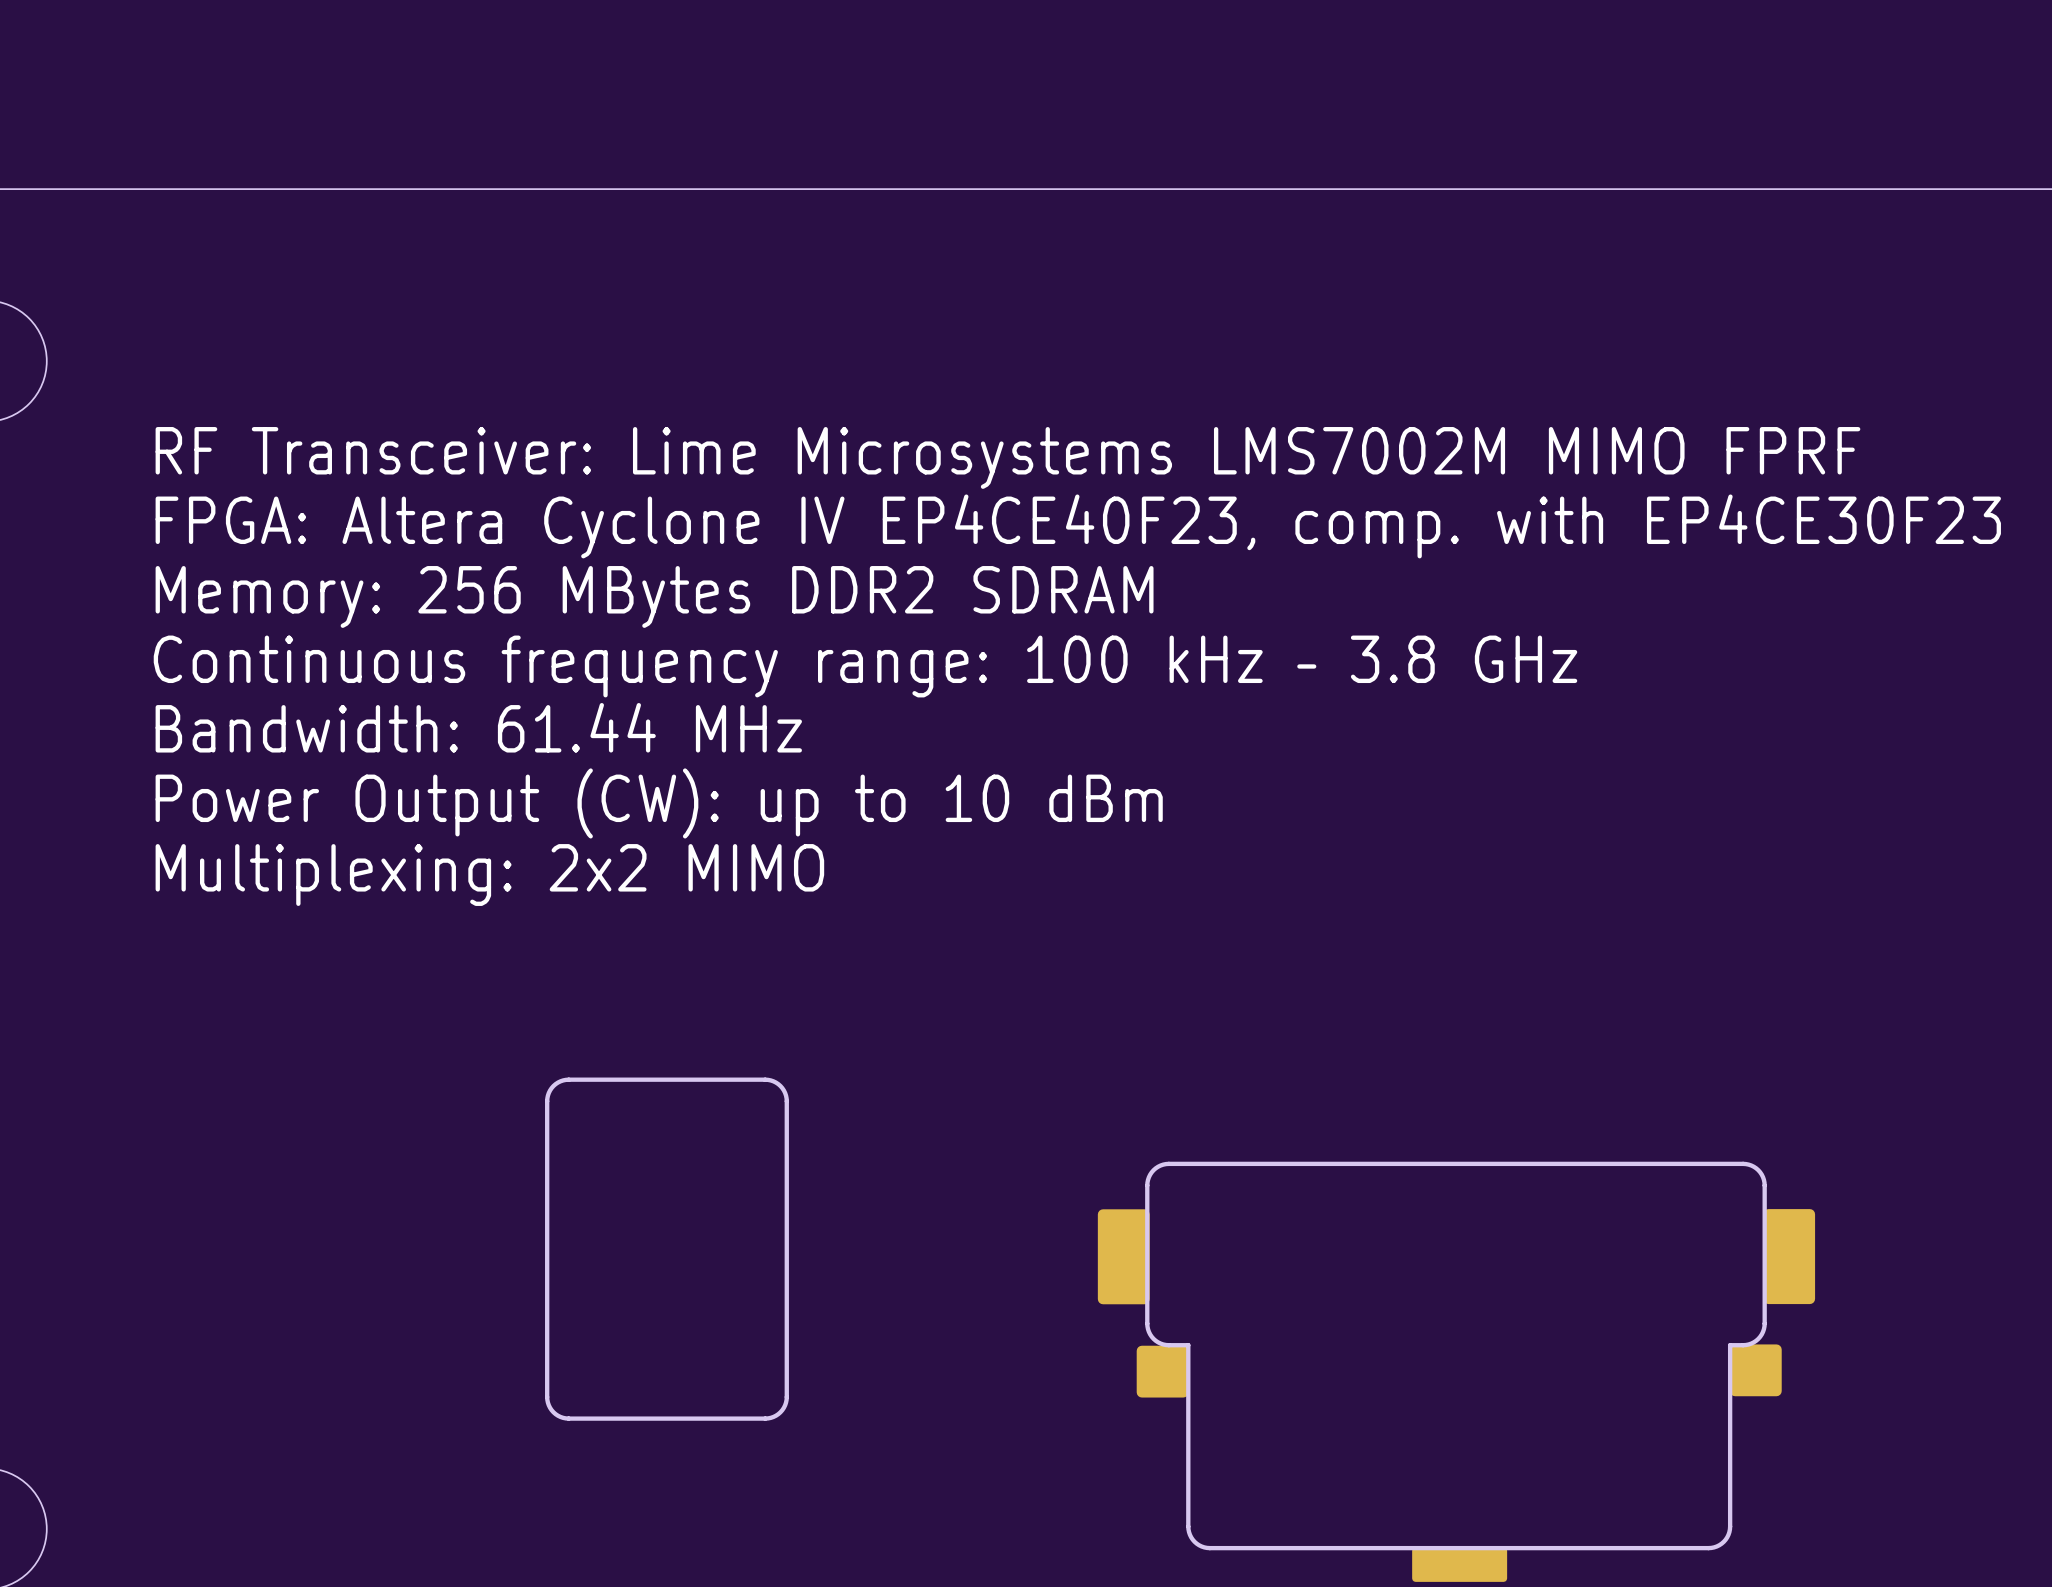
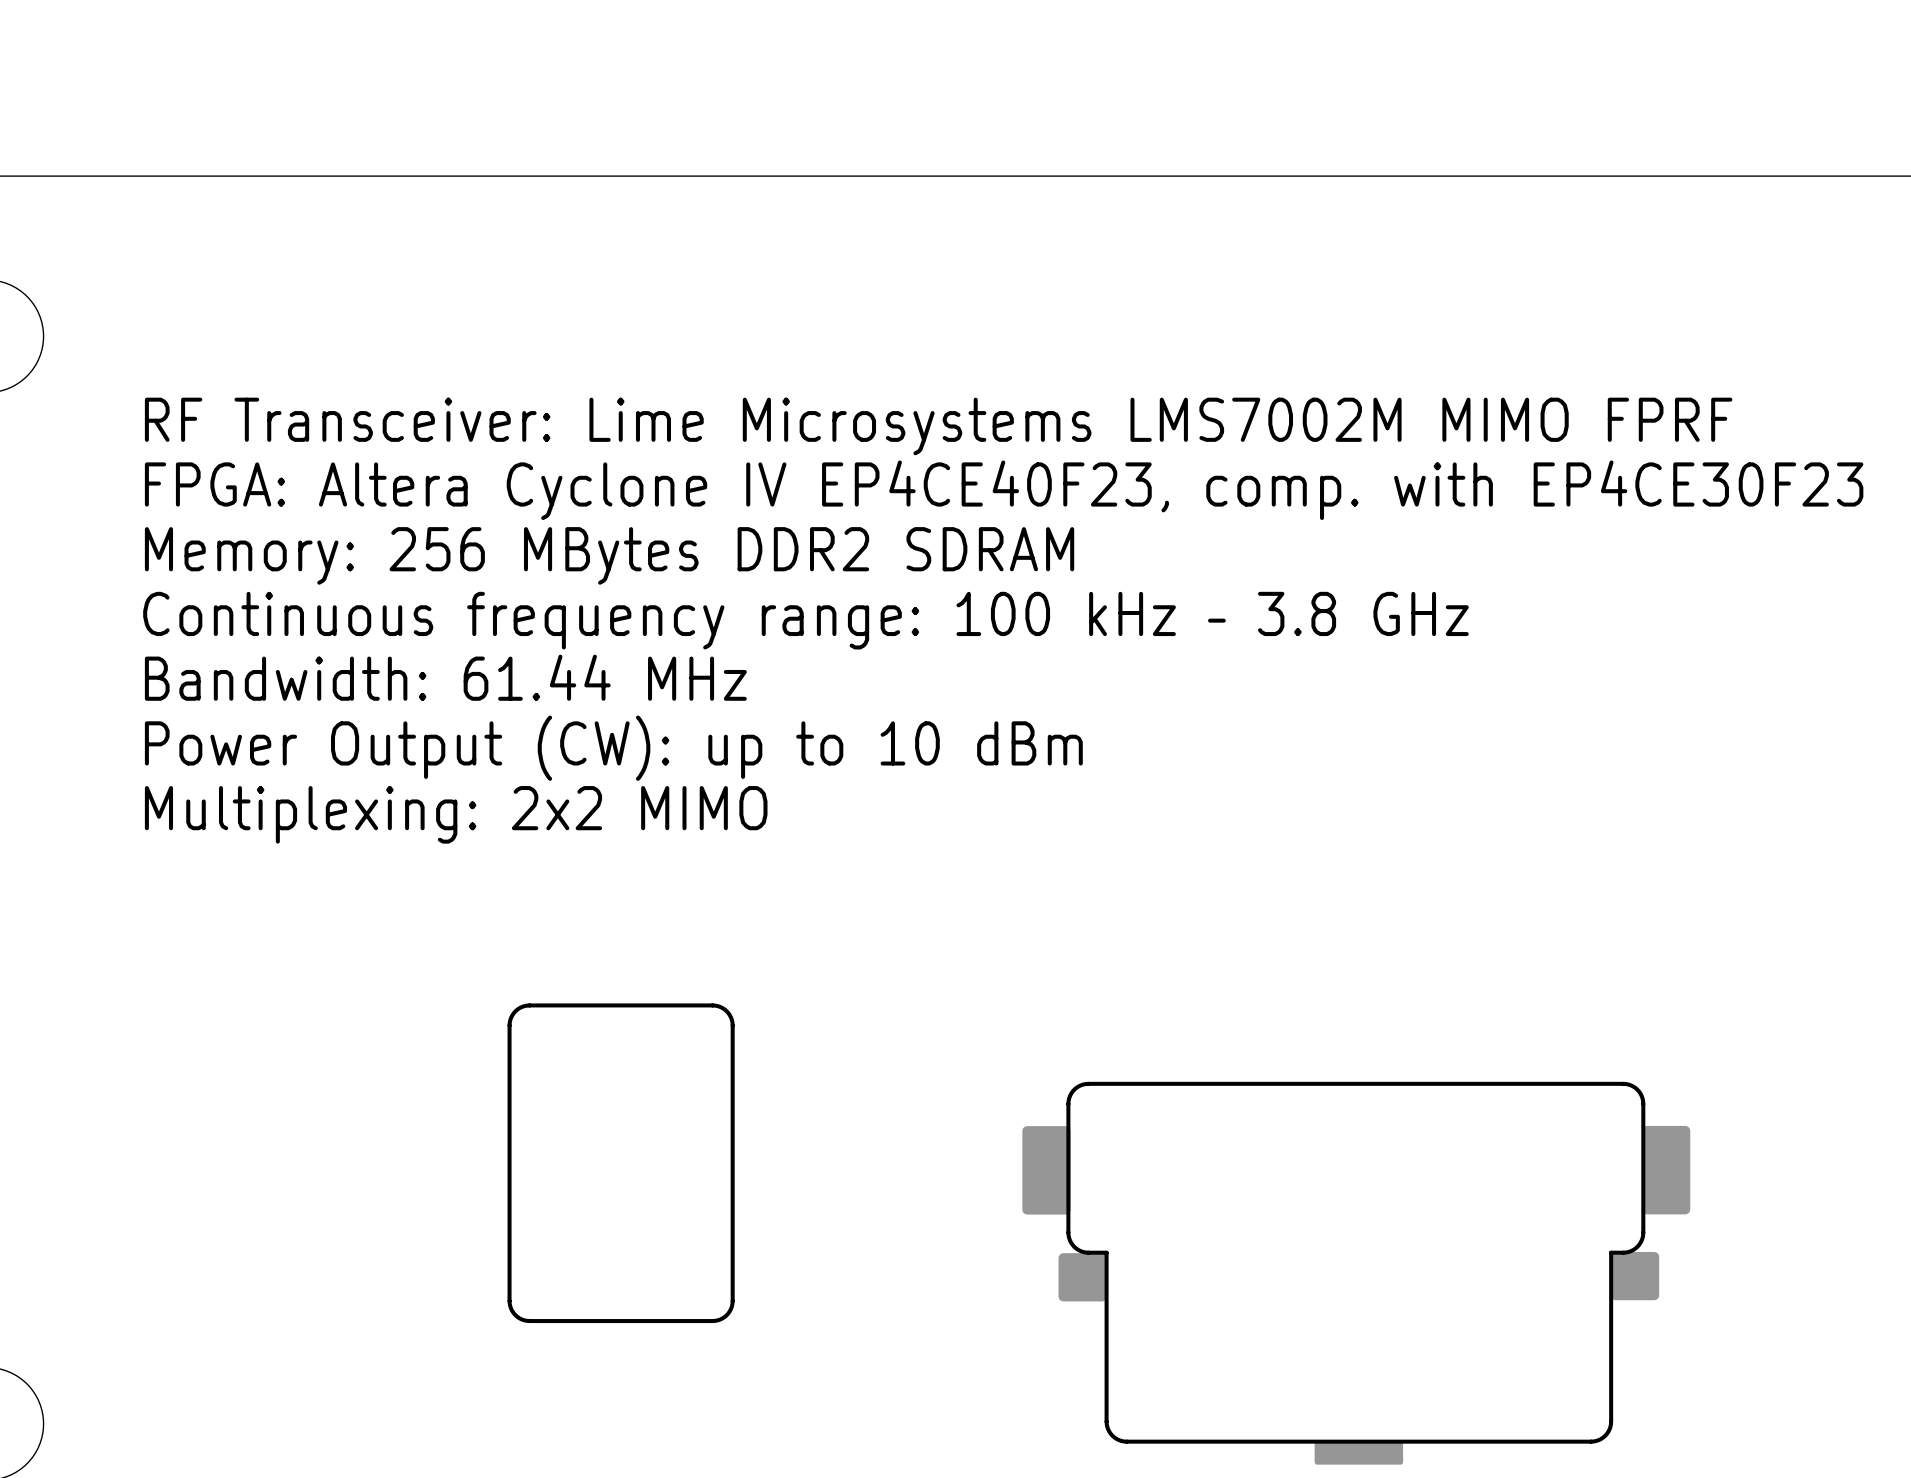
part footprint: [1412, 1547, 1508, 1582] -> [1314, 1440, 1404, 1465]

